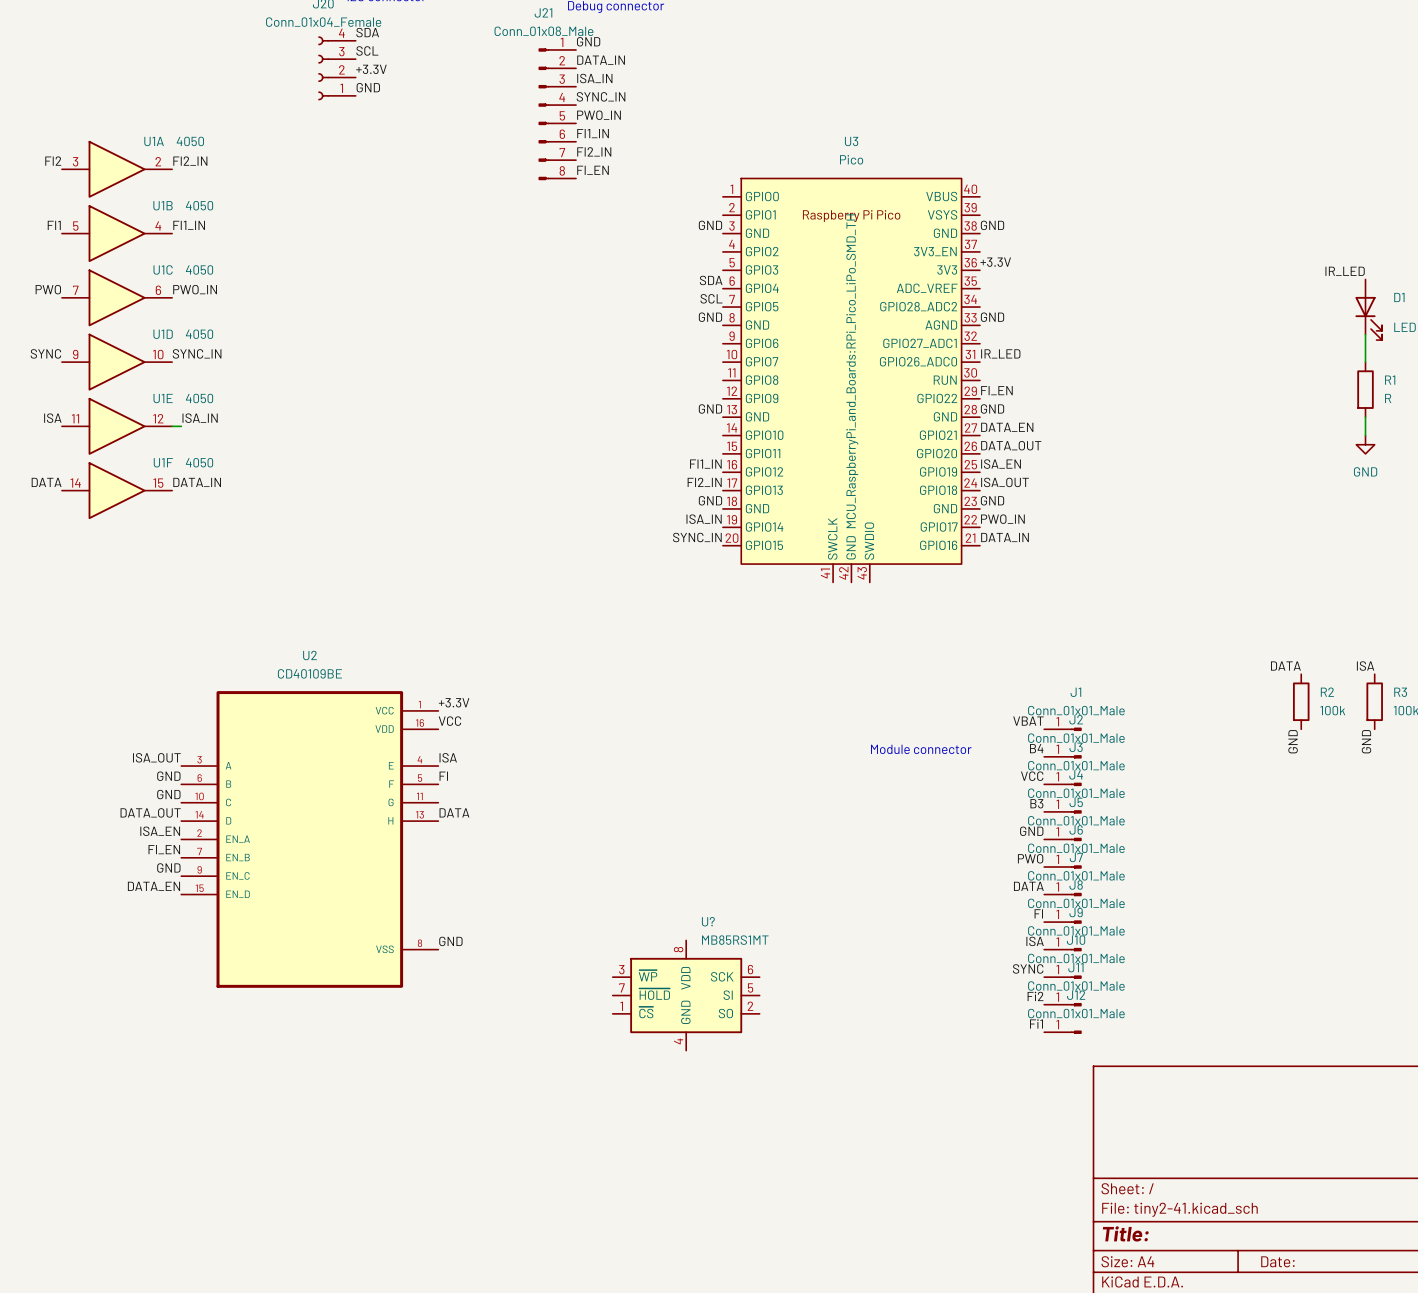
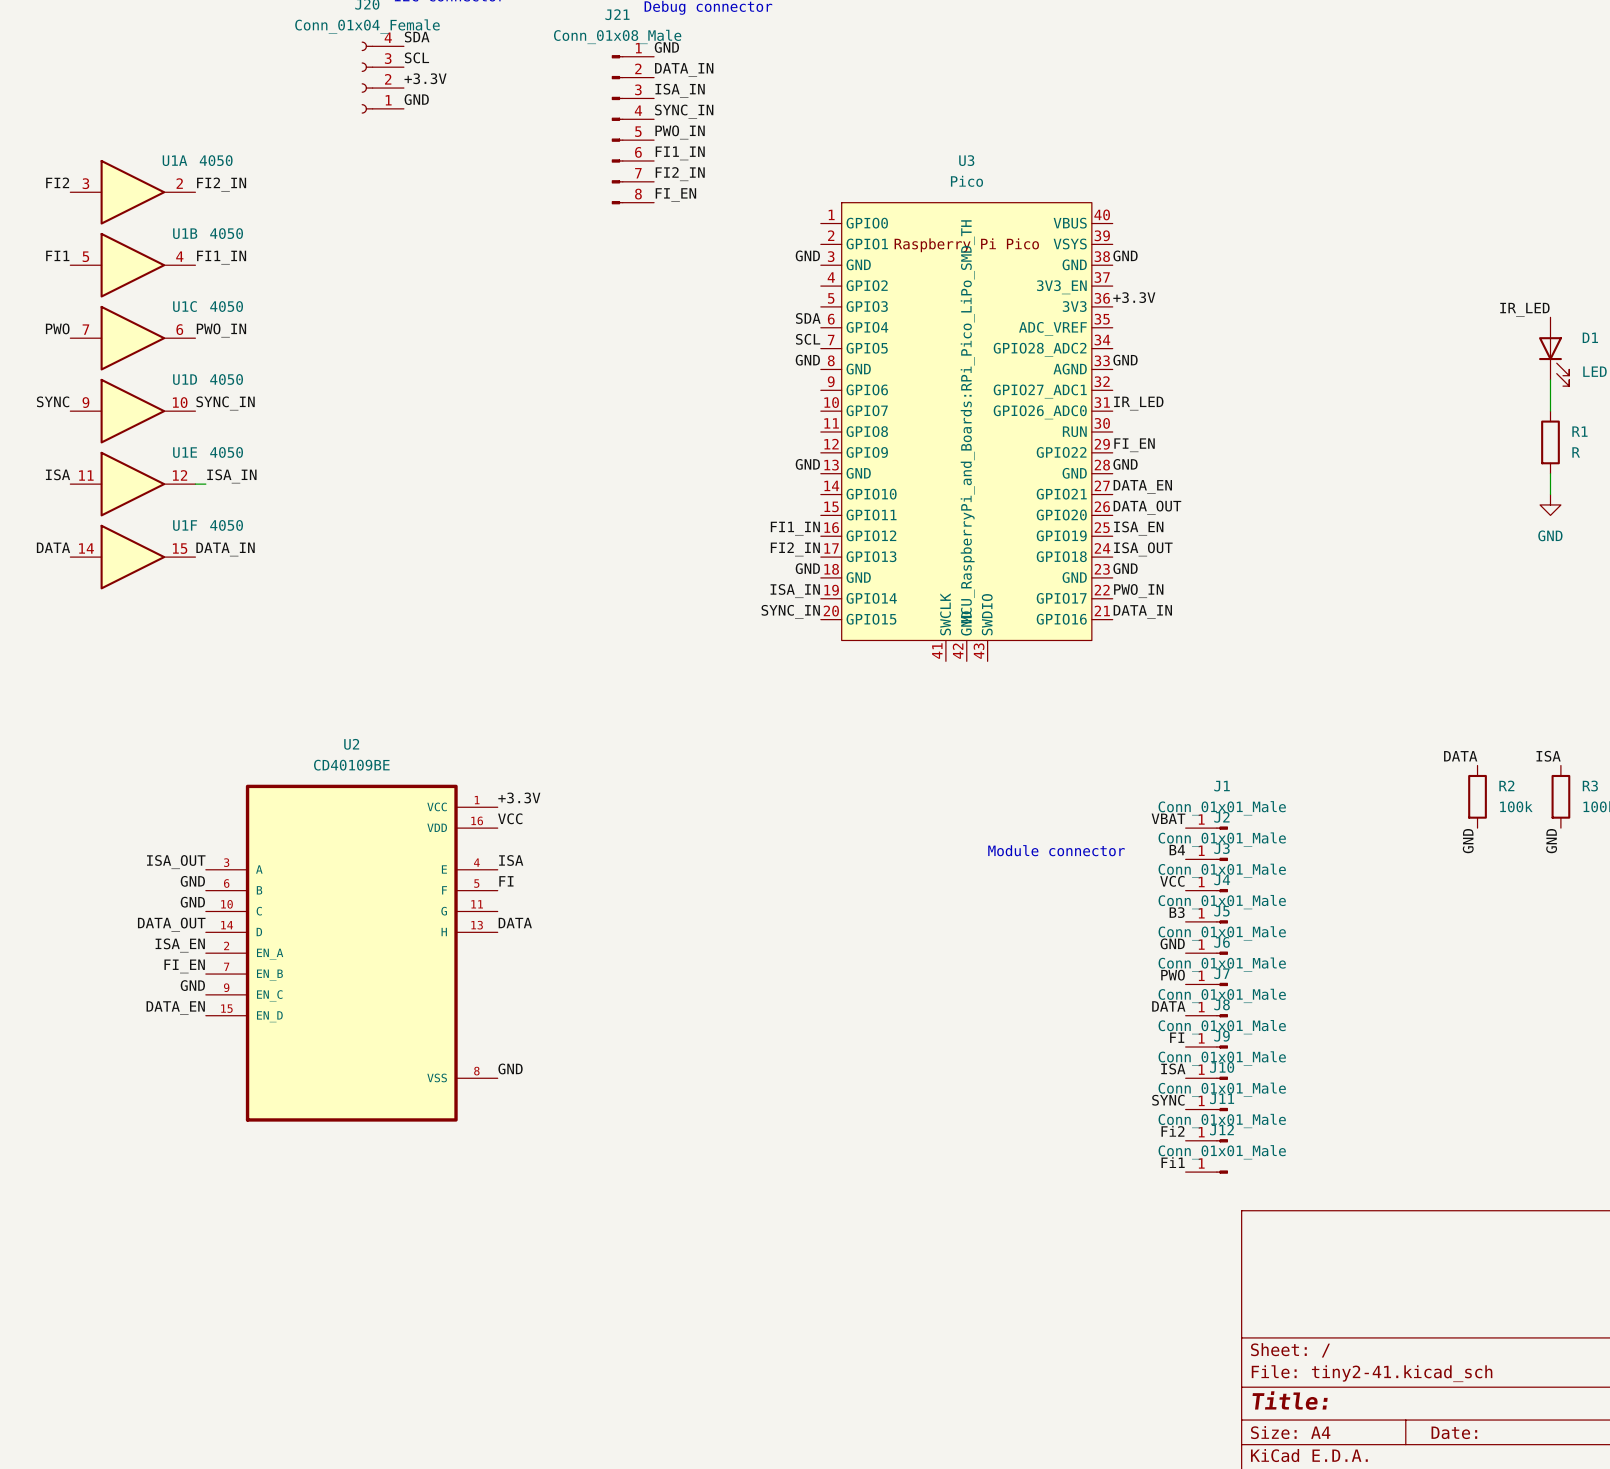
U?: MB85RS1MT (686, 995) -> none

